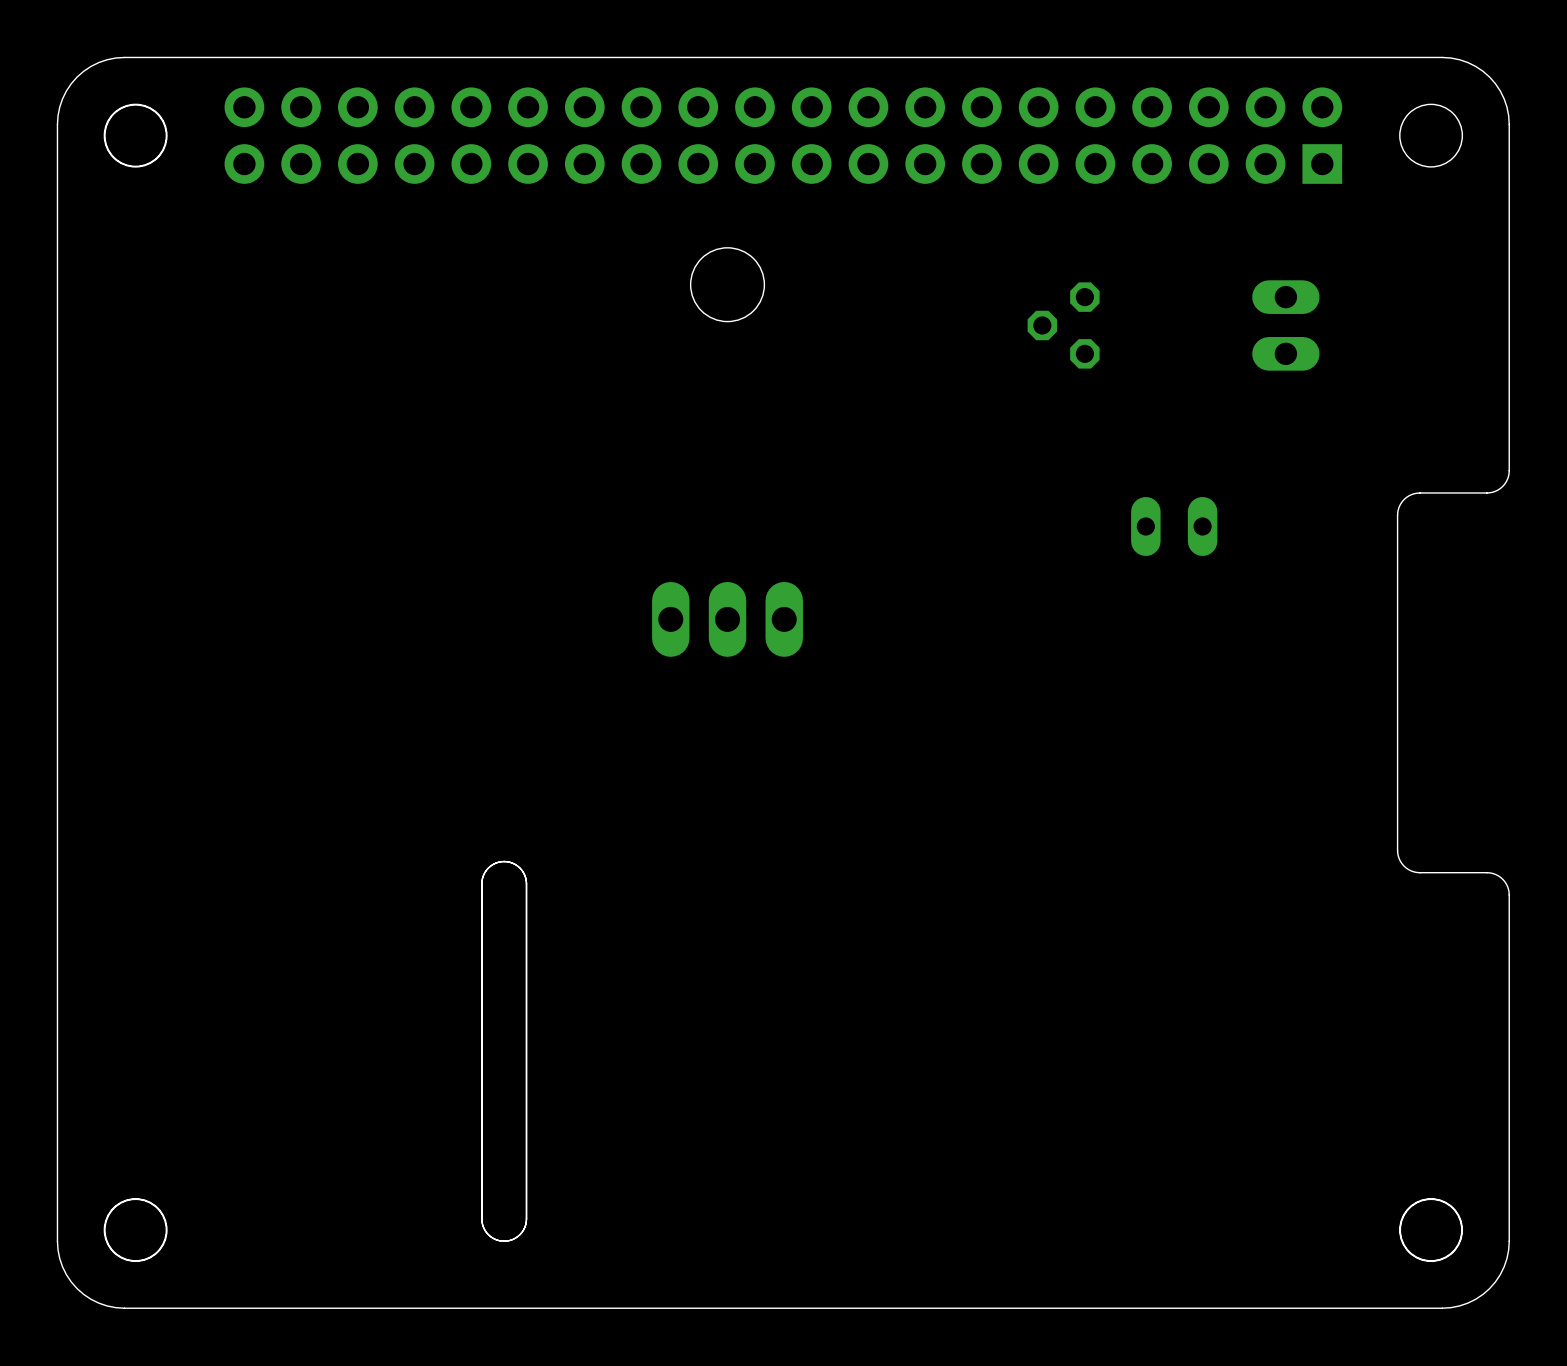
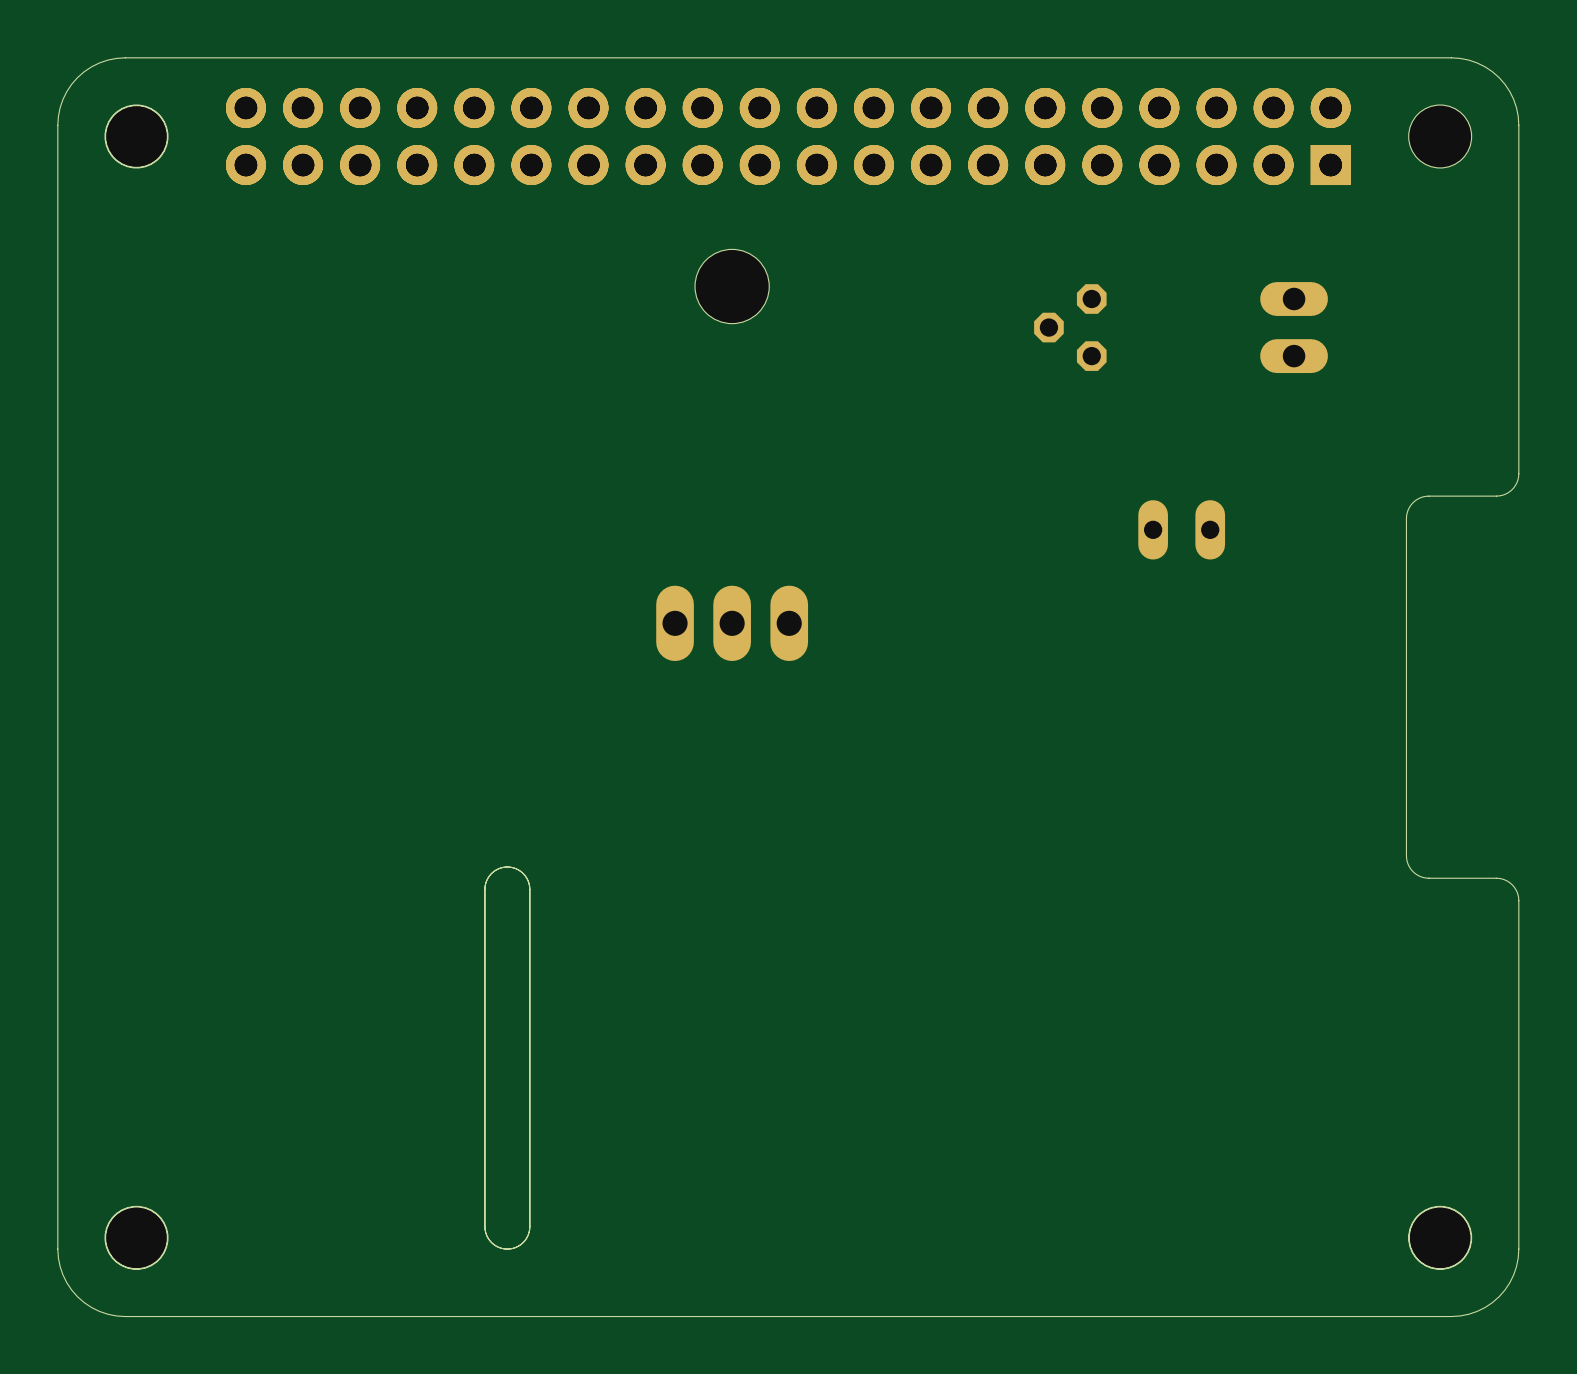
part: none -> (788, 136)

